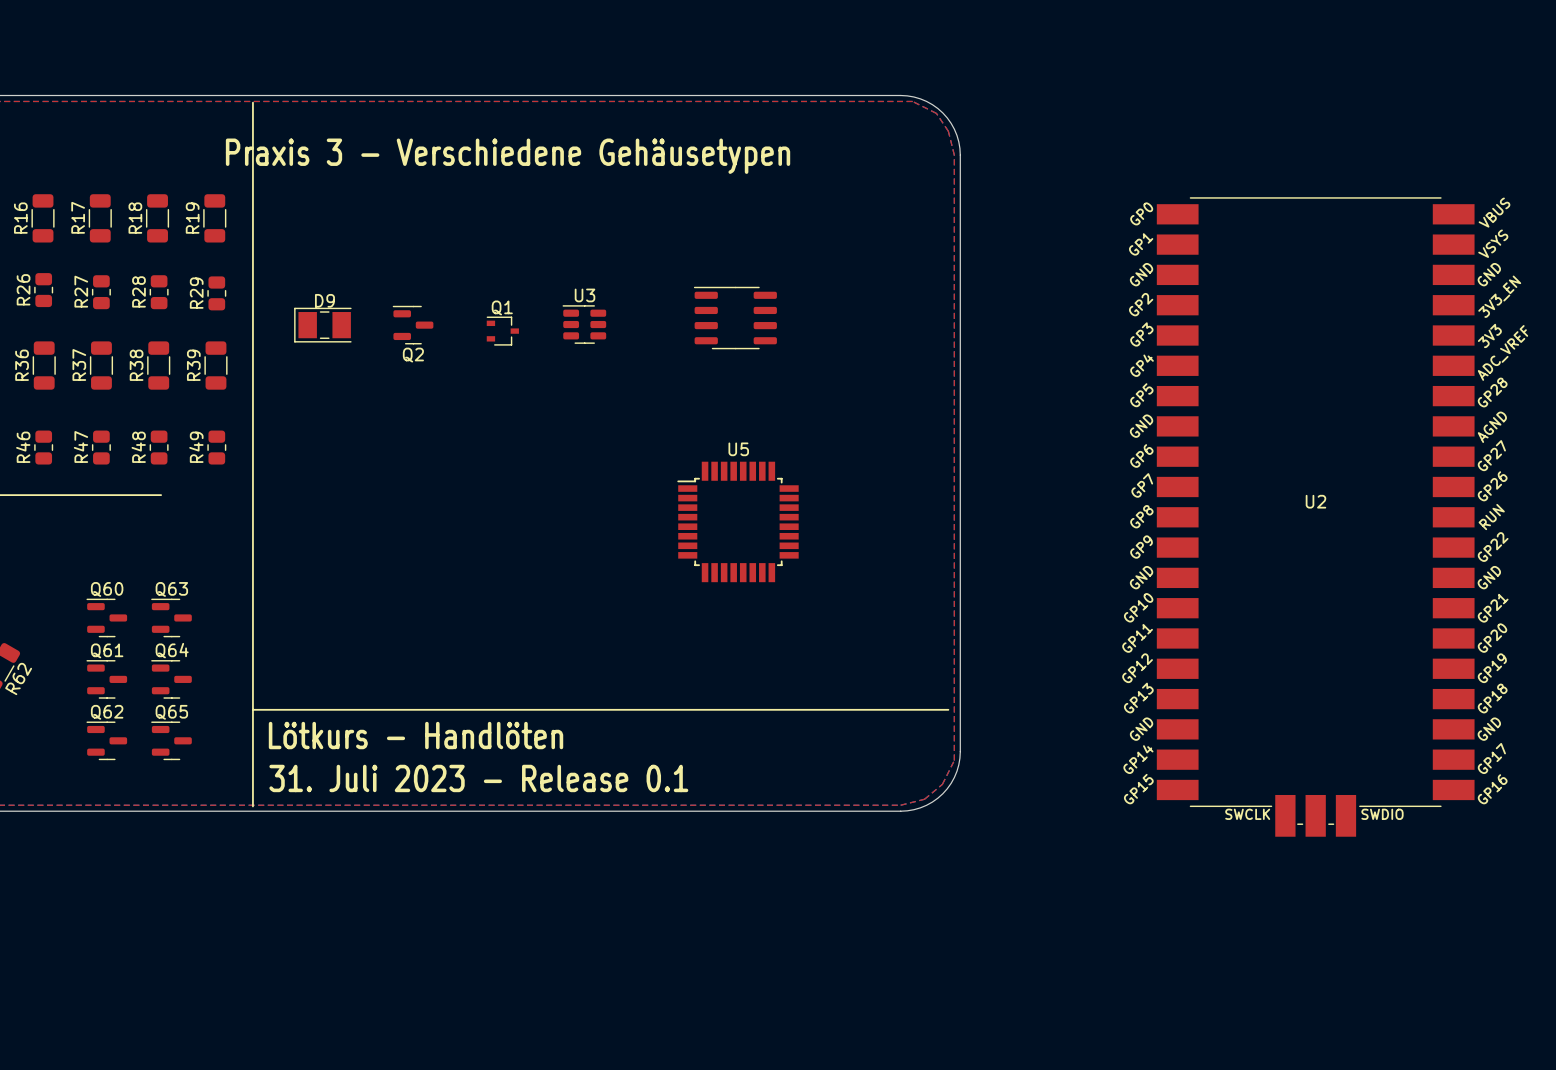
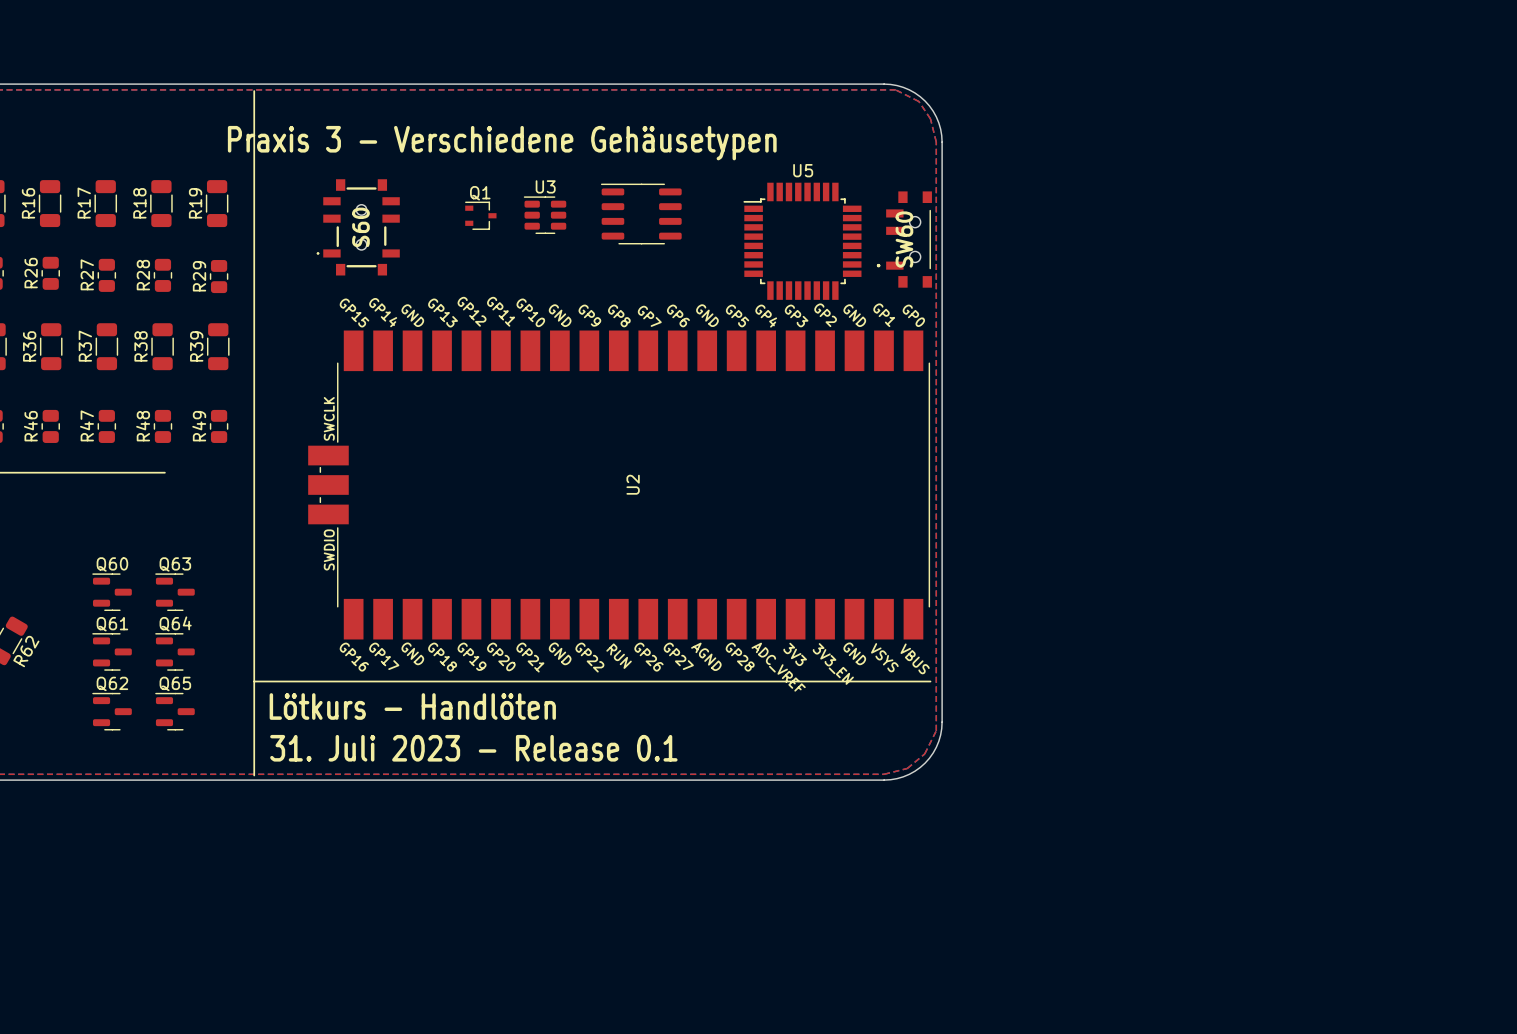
S60: none -> (358, 227)
SW60: none -> (904, 239)
part position: (735, 318) -> (641, 214)
U3 position: (584, 324) -> (545, 215)
D9: (322, 325) -> none
Q2: (413, 325) -> none
Q1 position: (502, 331) -> (480, 215)
U2 rotation: 0° (1315, 516) -> 90° clockwise (619, 484)
U2 position: (1315, 516) -> (619, 484)
U5 position: (738, 521) -> (802, 241)

